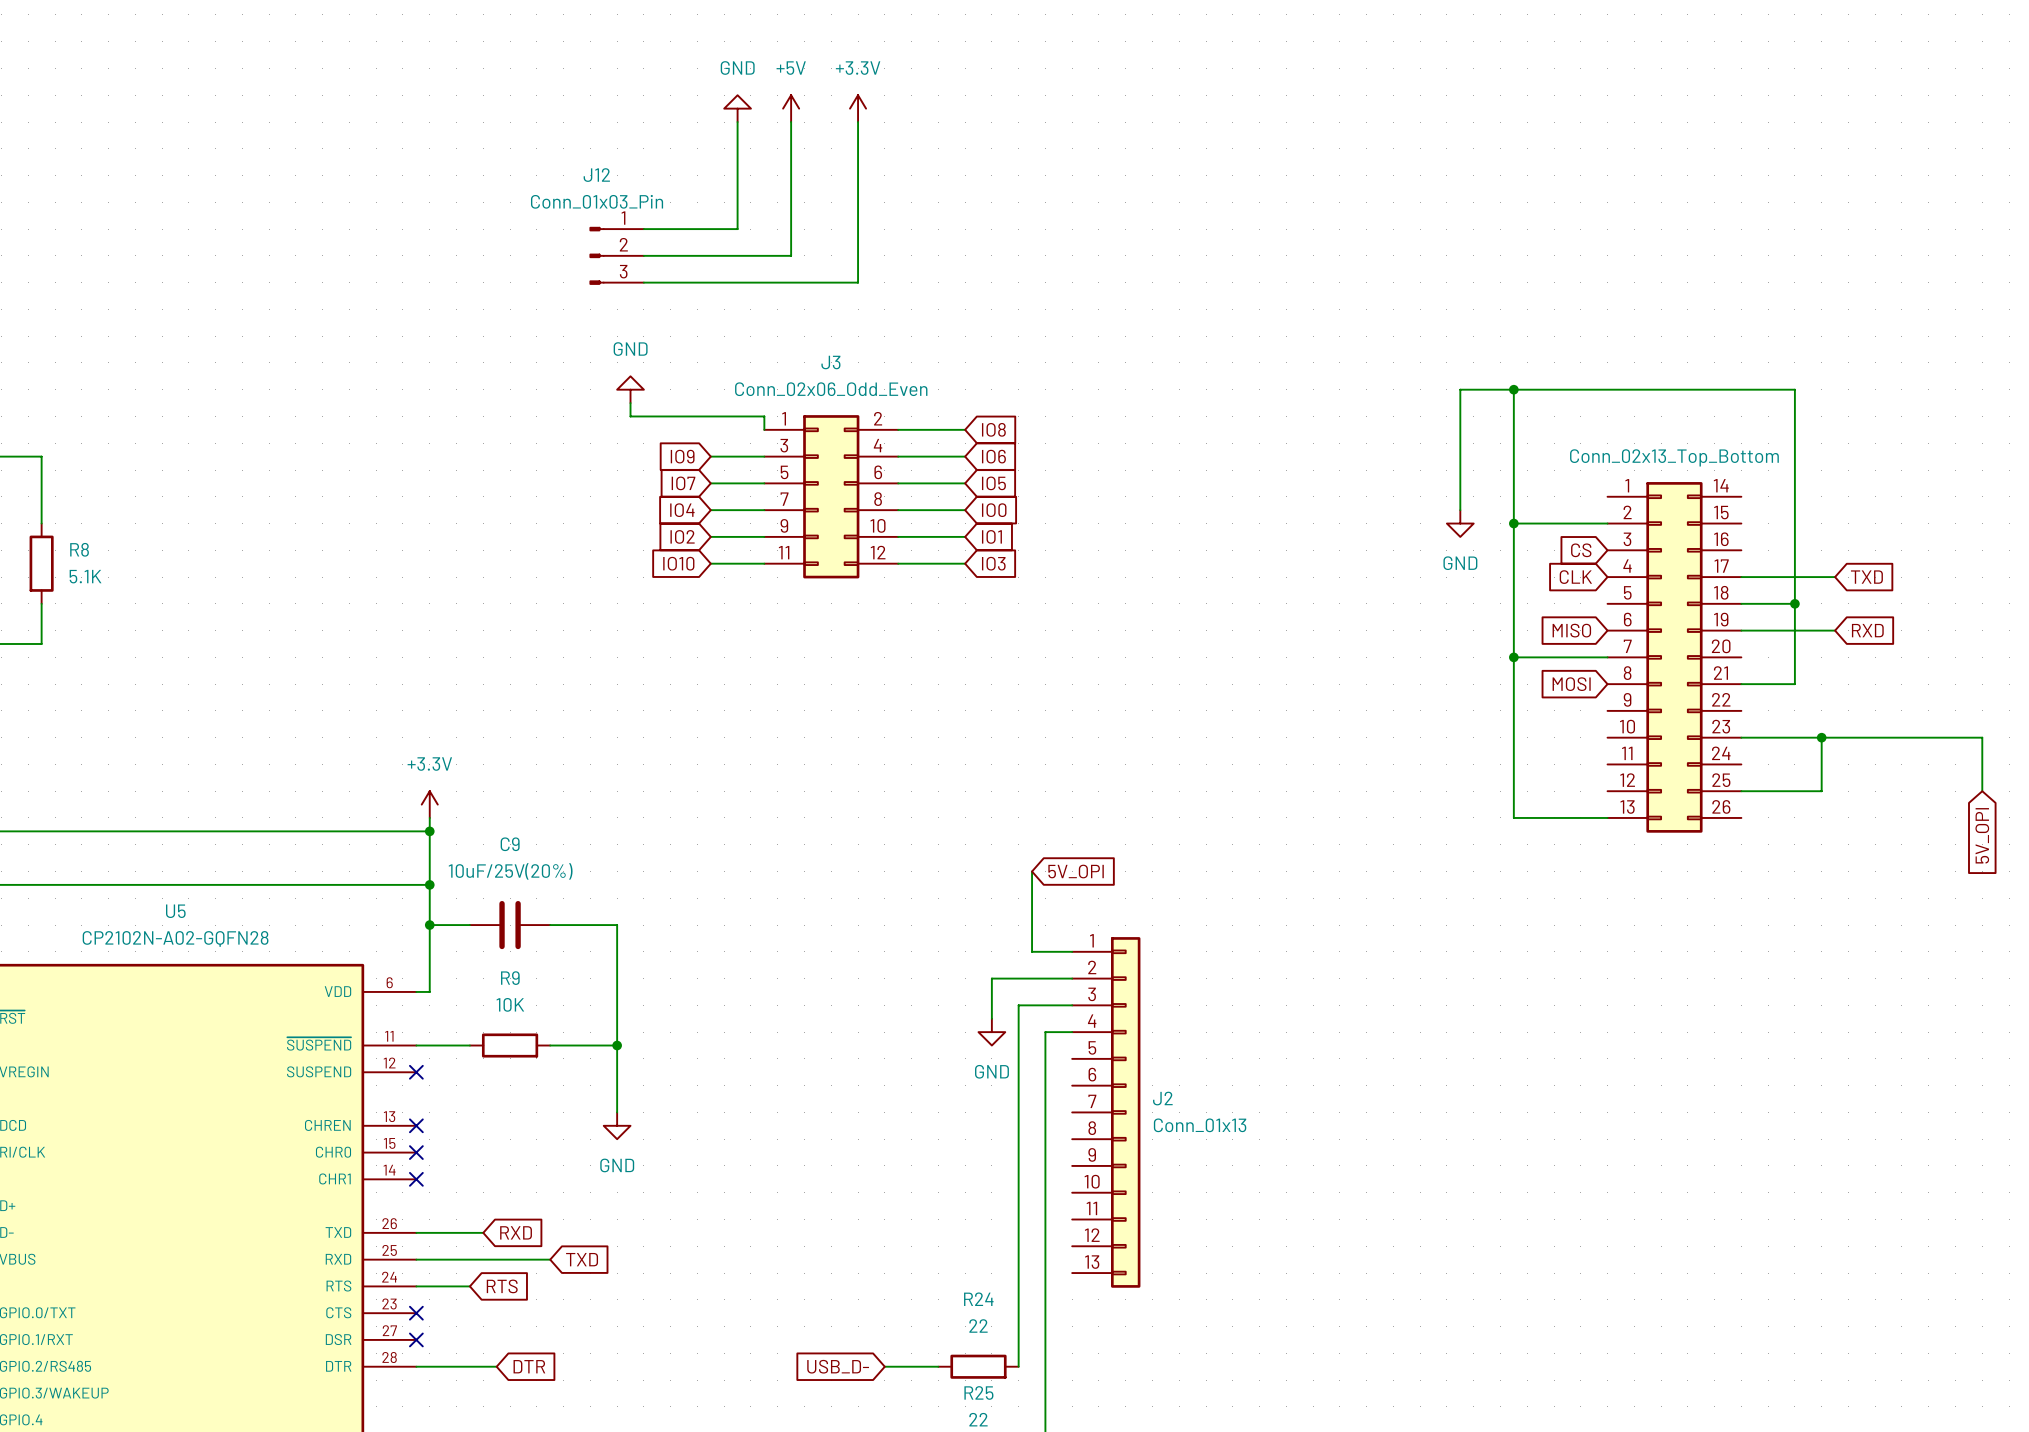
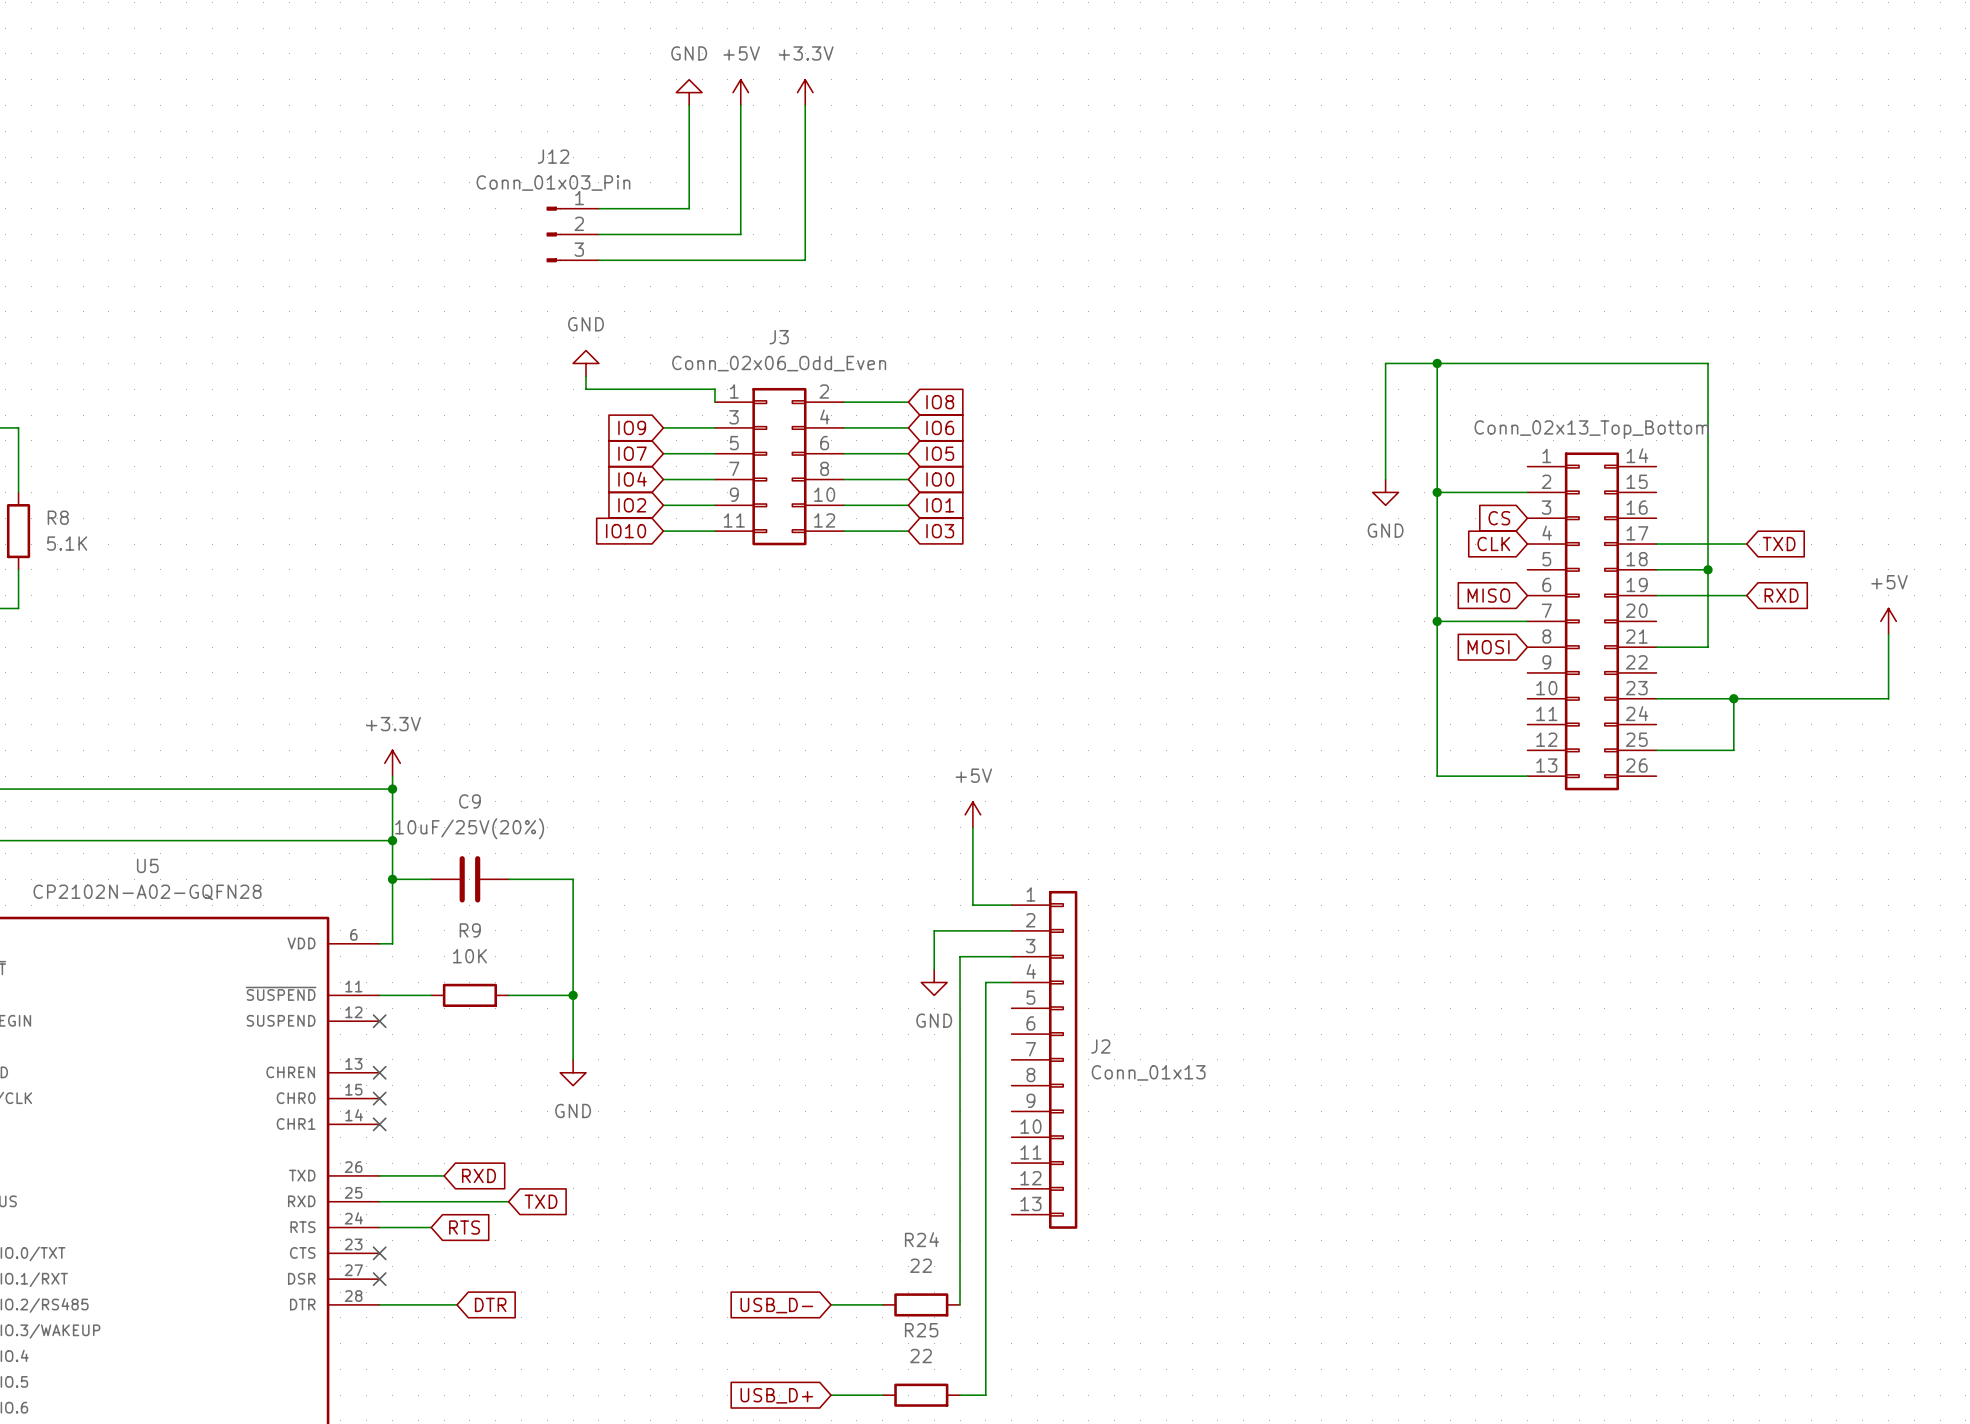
power symbol: none -> +5V (1888, 621)
wire: (1982, 737) (1982, 791) -> (1888, 698) (1888, 634)
global label: 5V_OPI (1982, 835) -> none
power symbol: none -> +5V (972, 814)
global label: 5V_OPI (1076, 871) -> none

